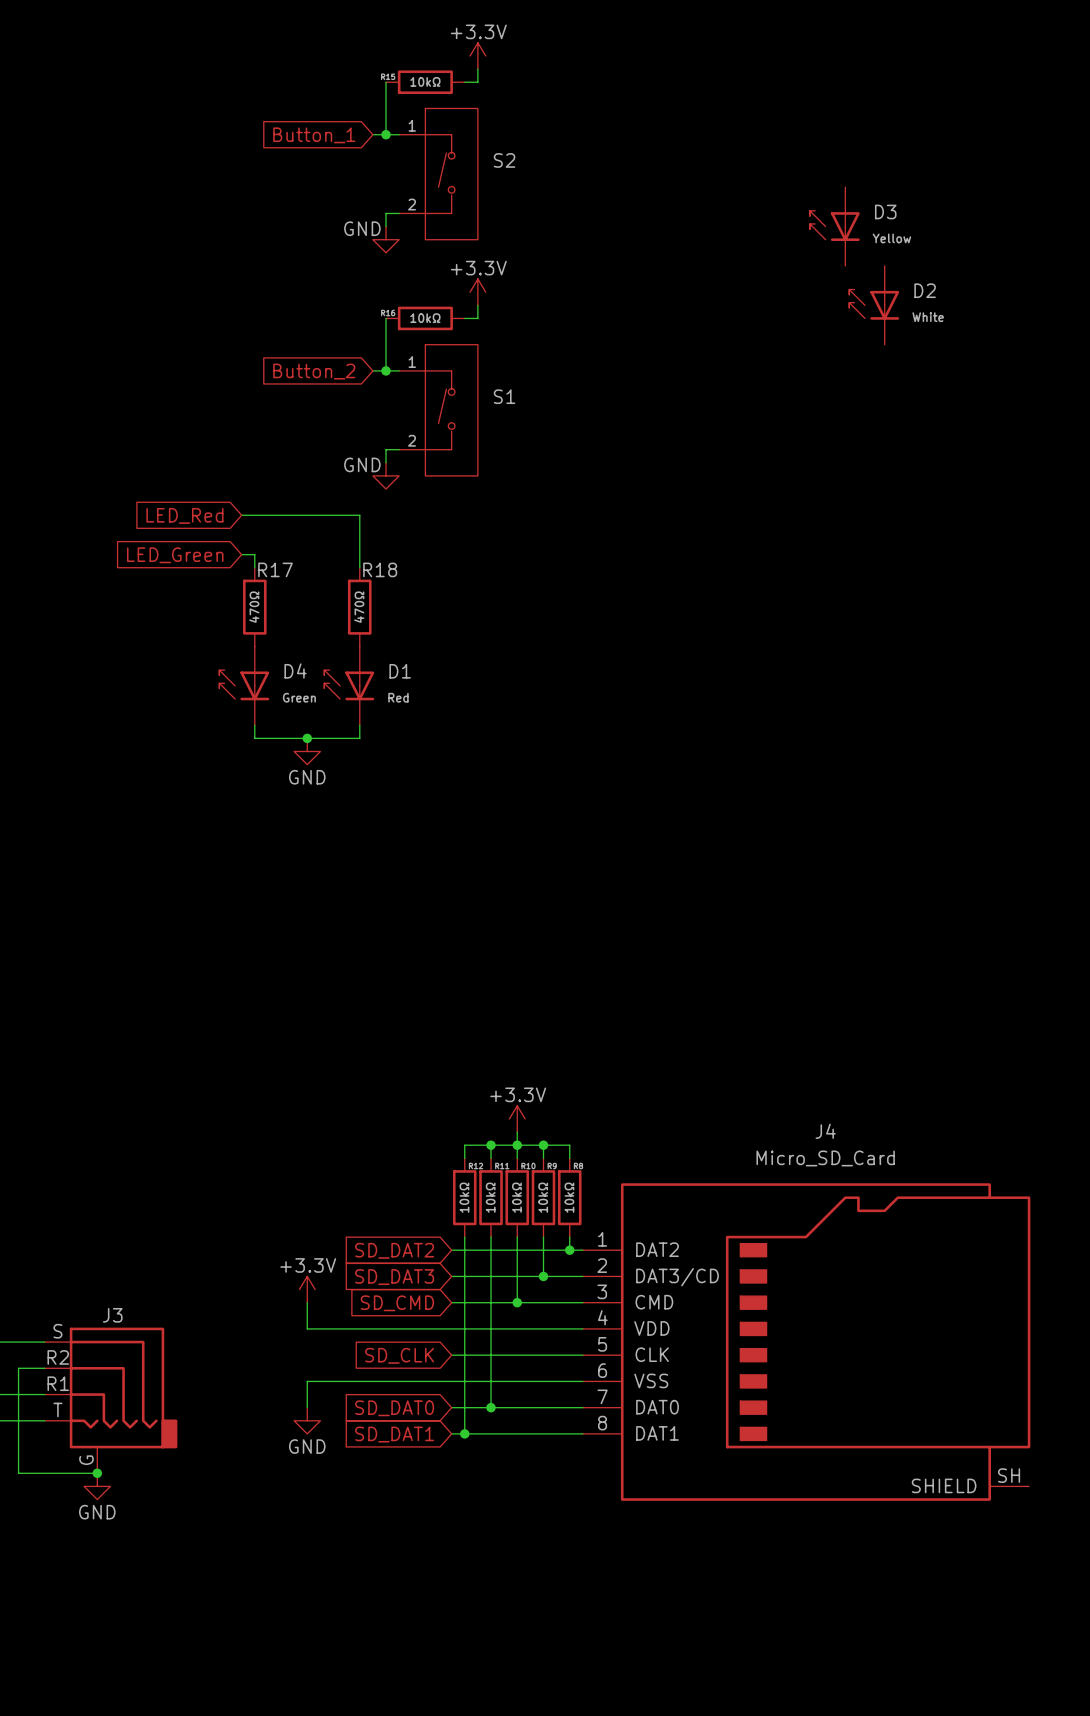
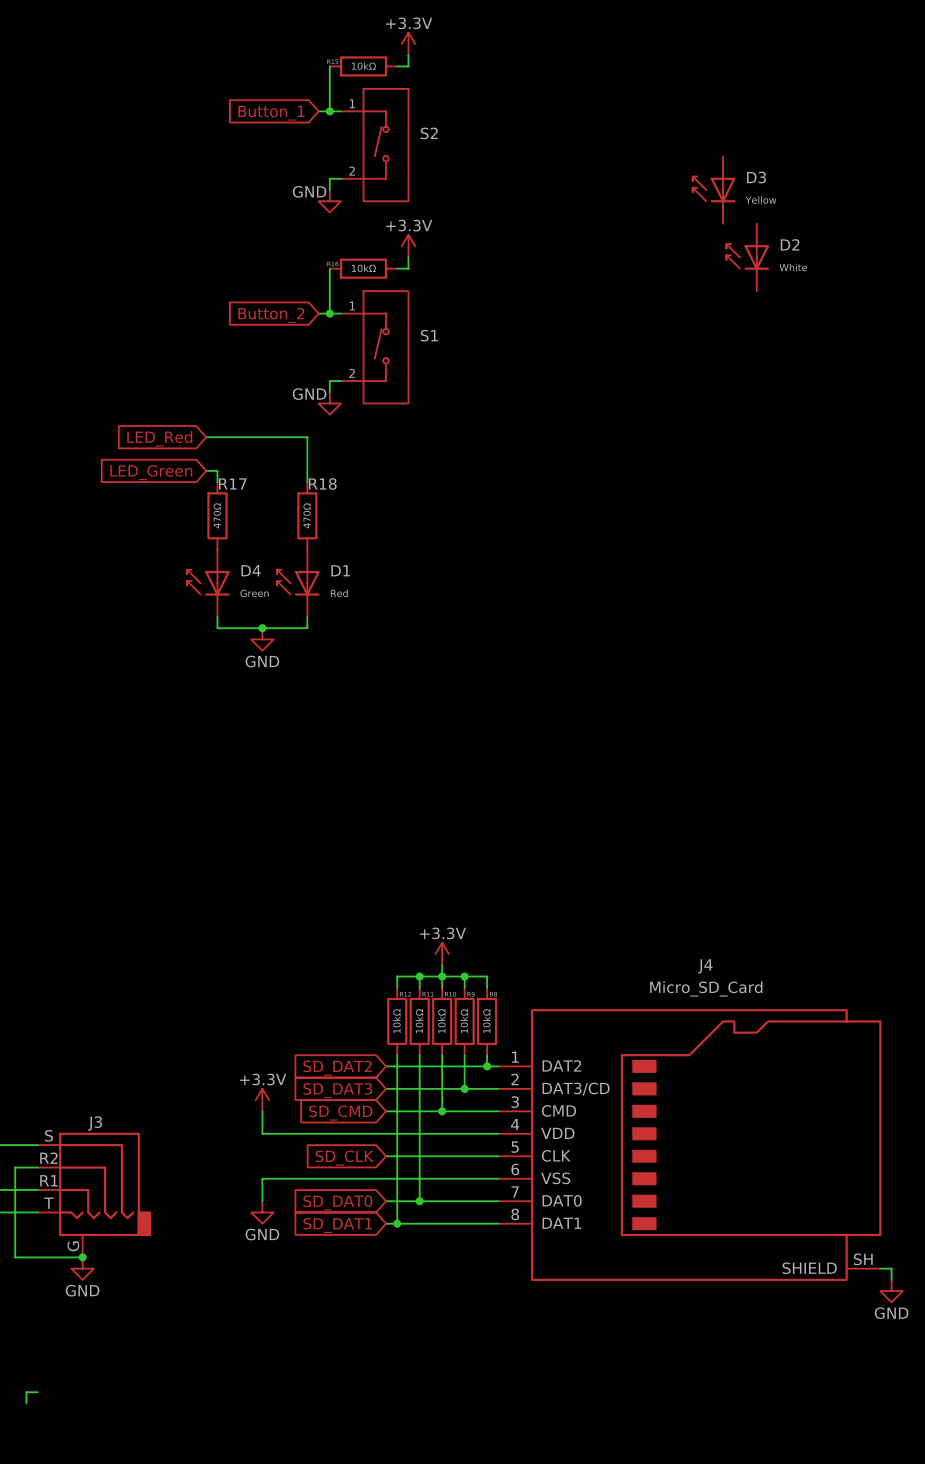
wire: none -> (880, 1268) (891, 1268) (891, 1279)
power symbol: none -> GND (891, 1291)
wire: none -> (37, 1392) (26, 1392) (26, 1403)

